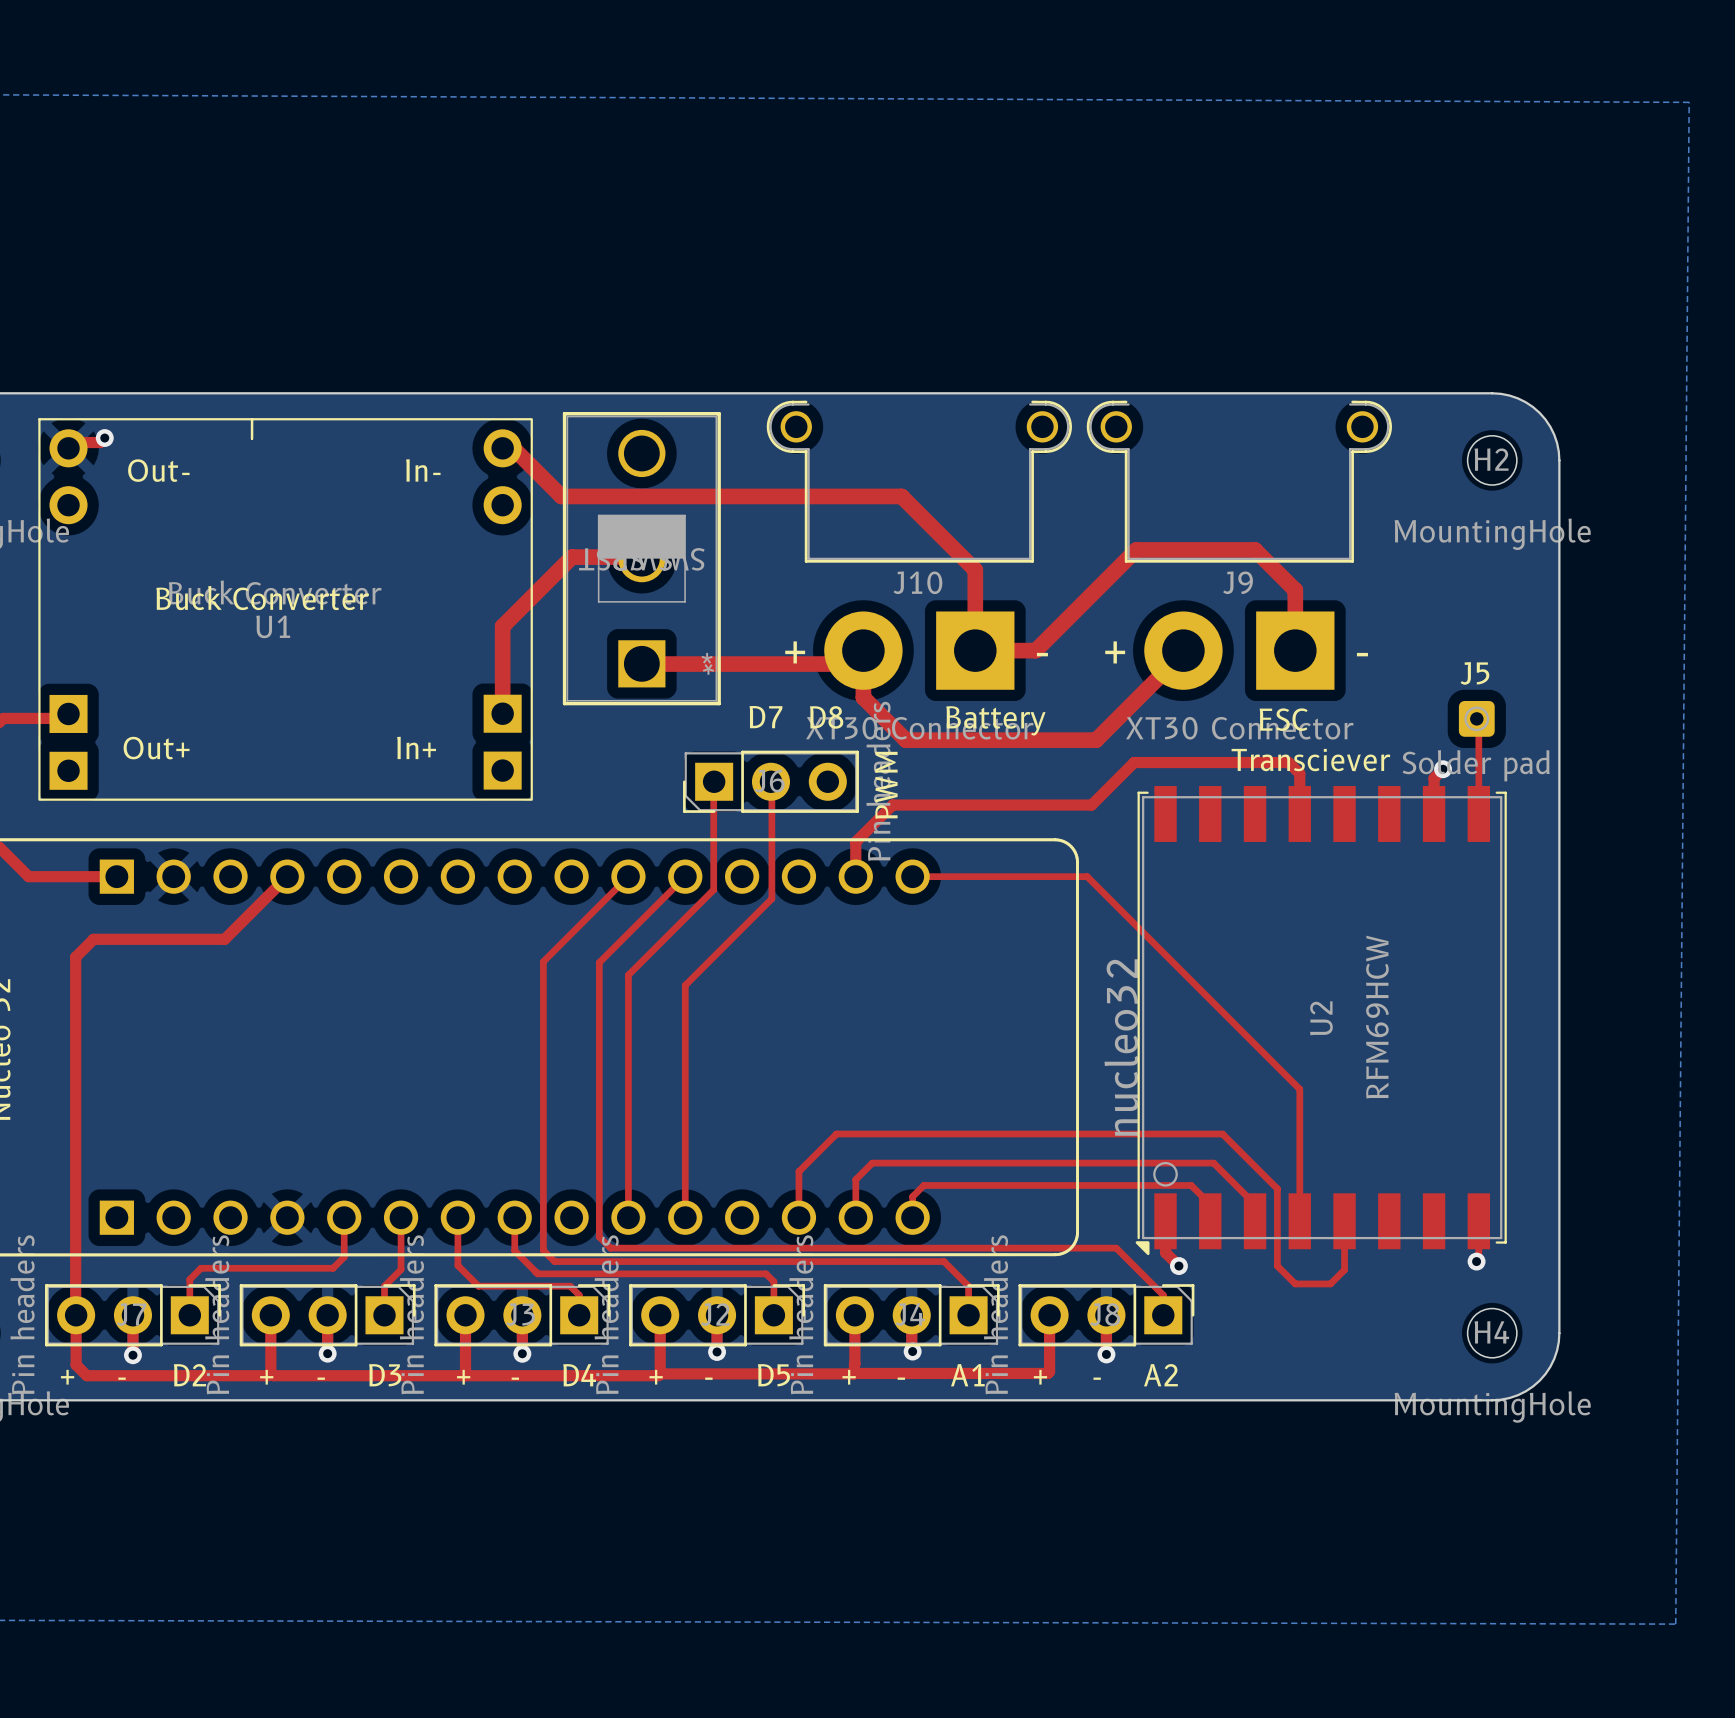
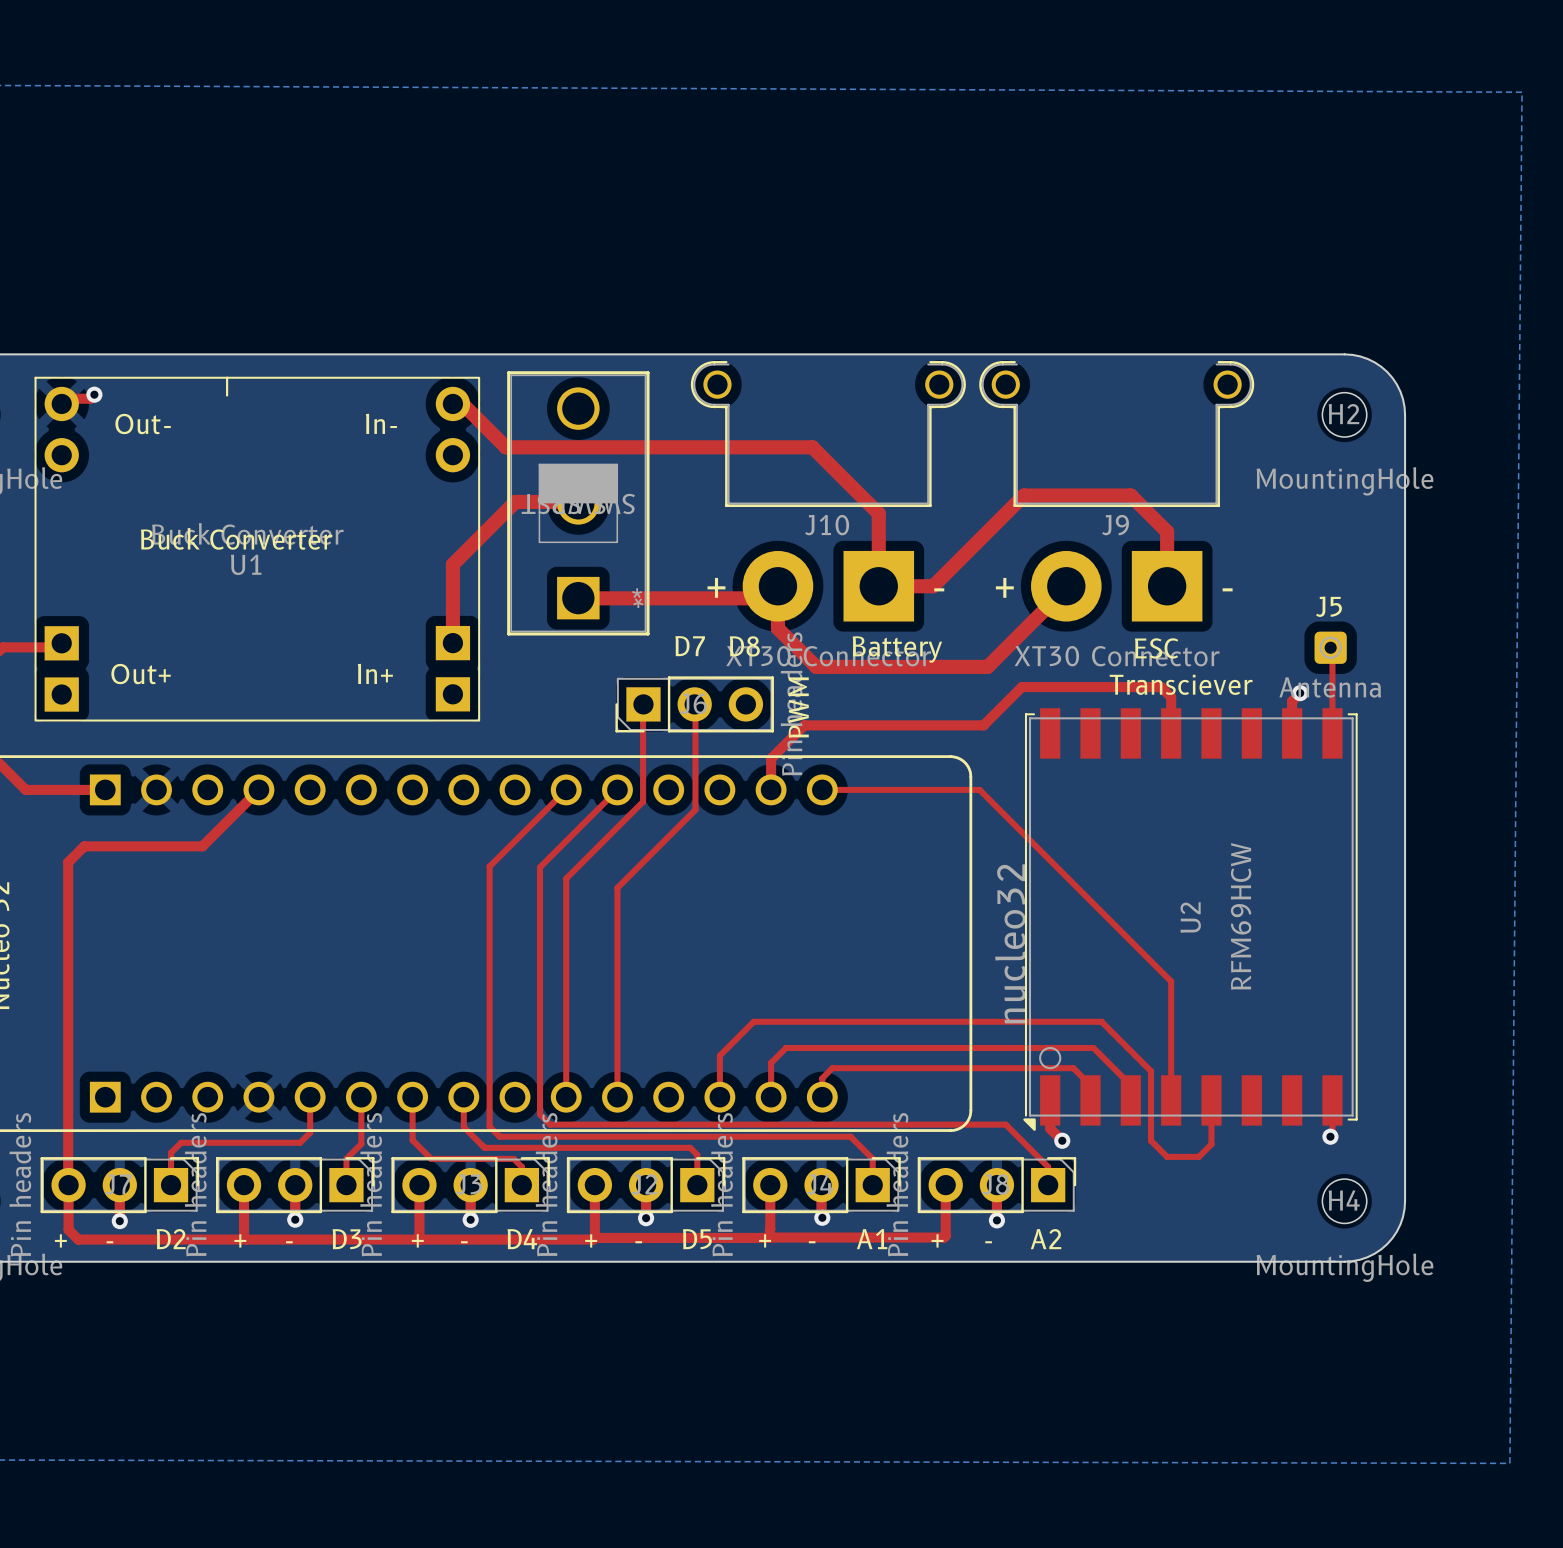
J5 value: Solder pad (1476, 765) -> Antenna (1330, 687)

